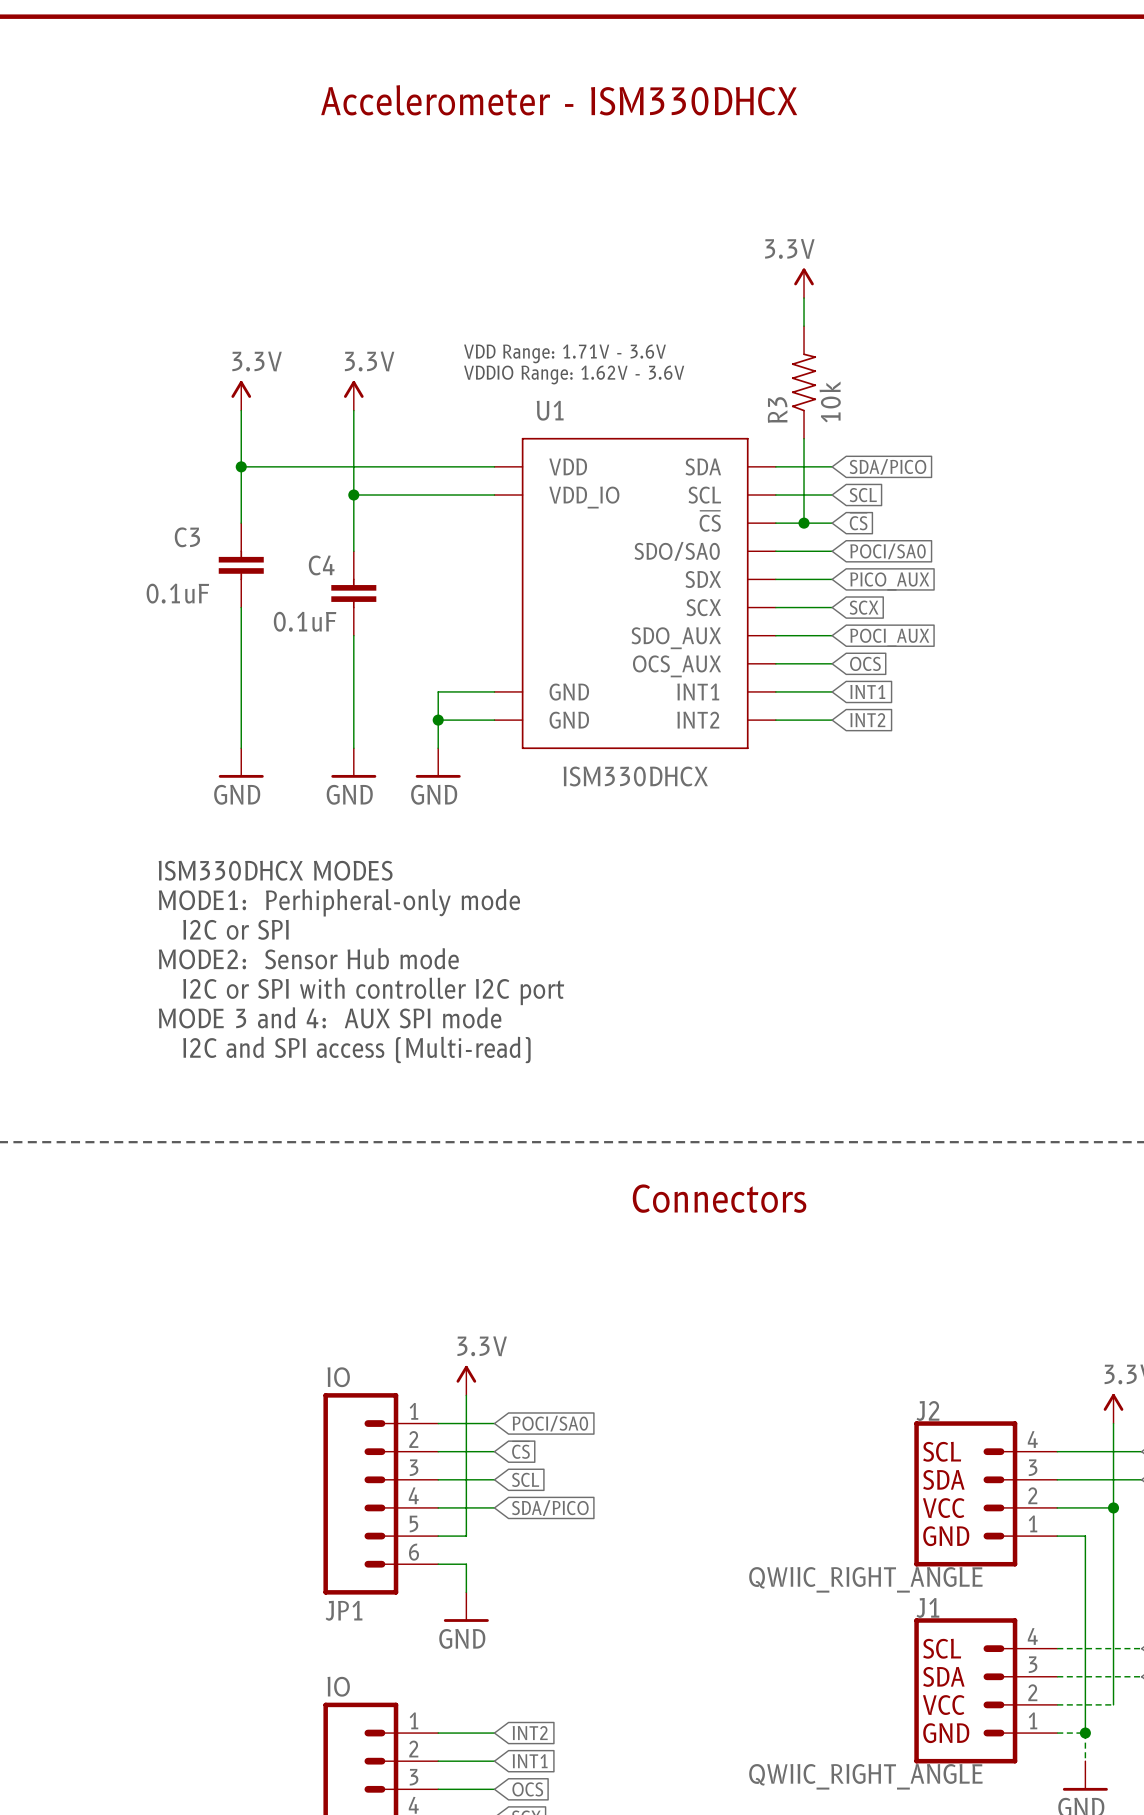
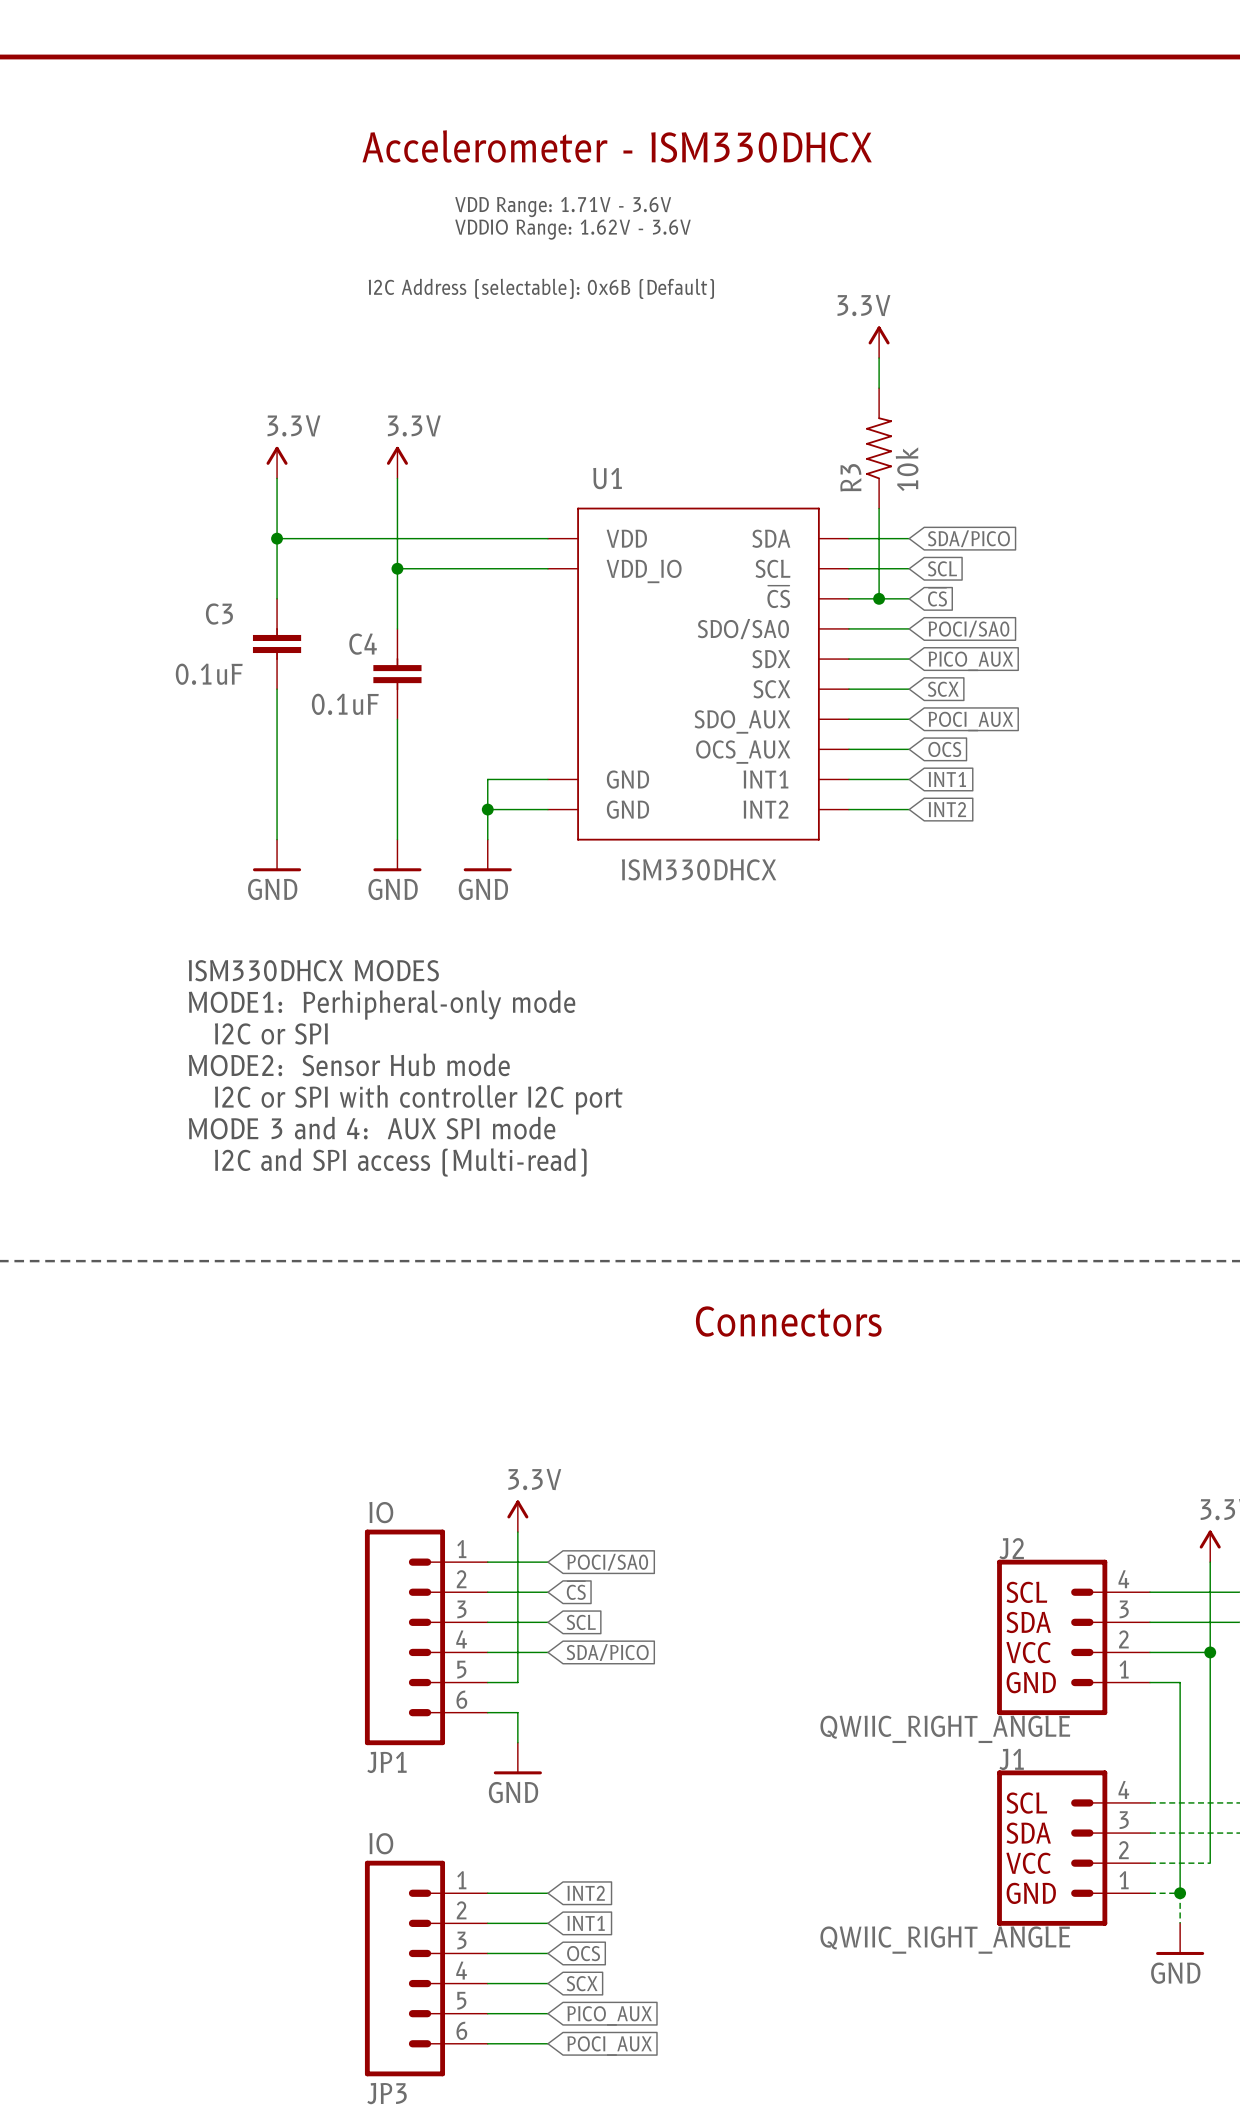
text: none -> I2C Address (selectable): 0x6B (Default) (541, 288)
text position: VDD Range: 1.71V - 3.6V (564, 353) -> VDD Range: 1.71V - 3.6V (563, 207)
text position: VDDIO Range: 1.62V - 3.6V (574, 374) -> VDDIO Range: 1.62V - 3.6V (572, 229)

